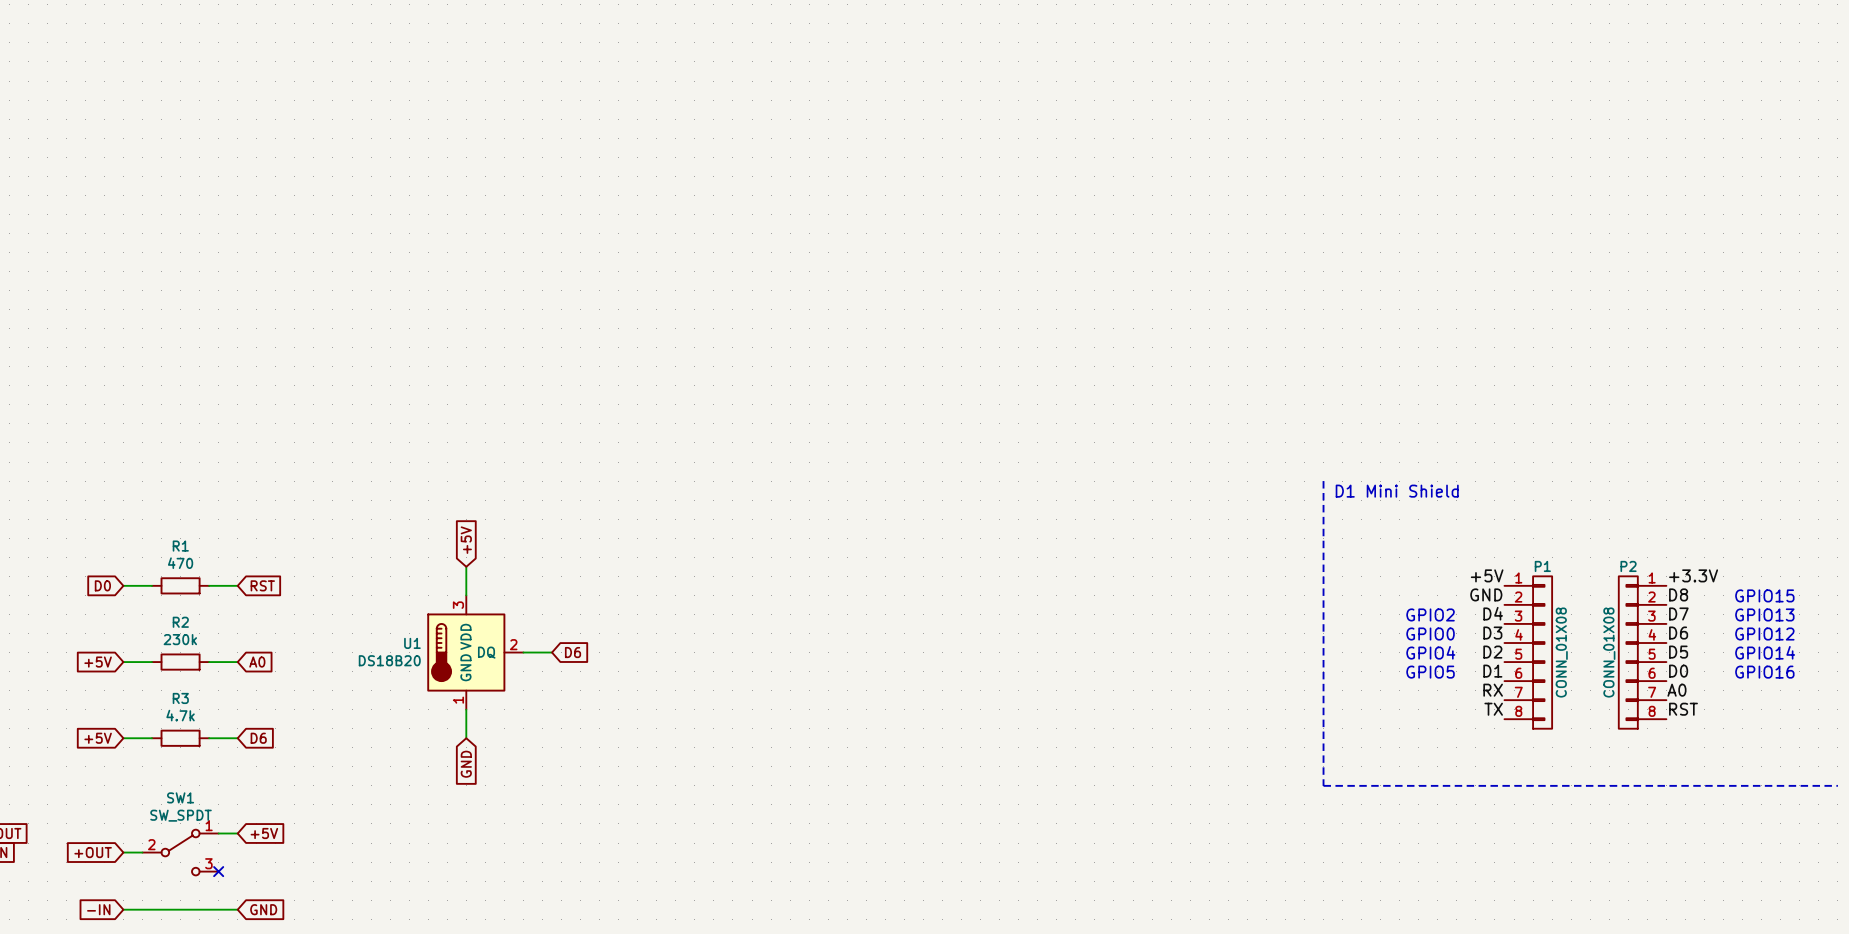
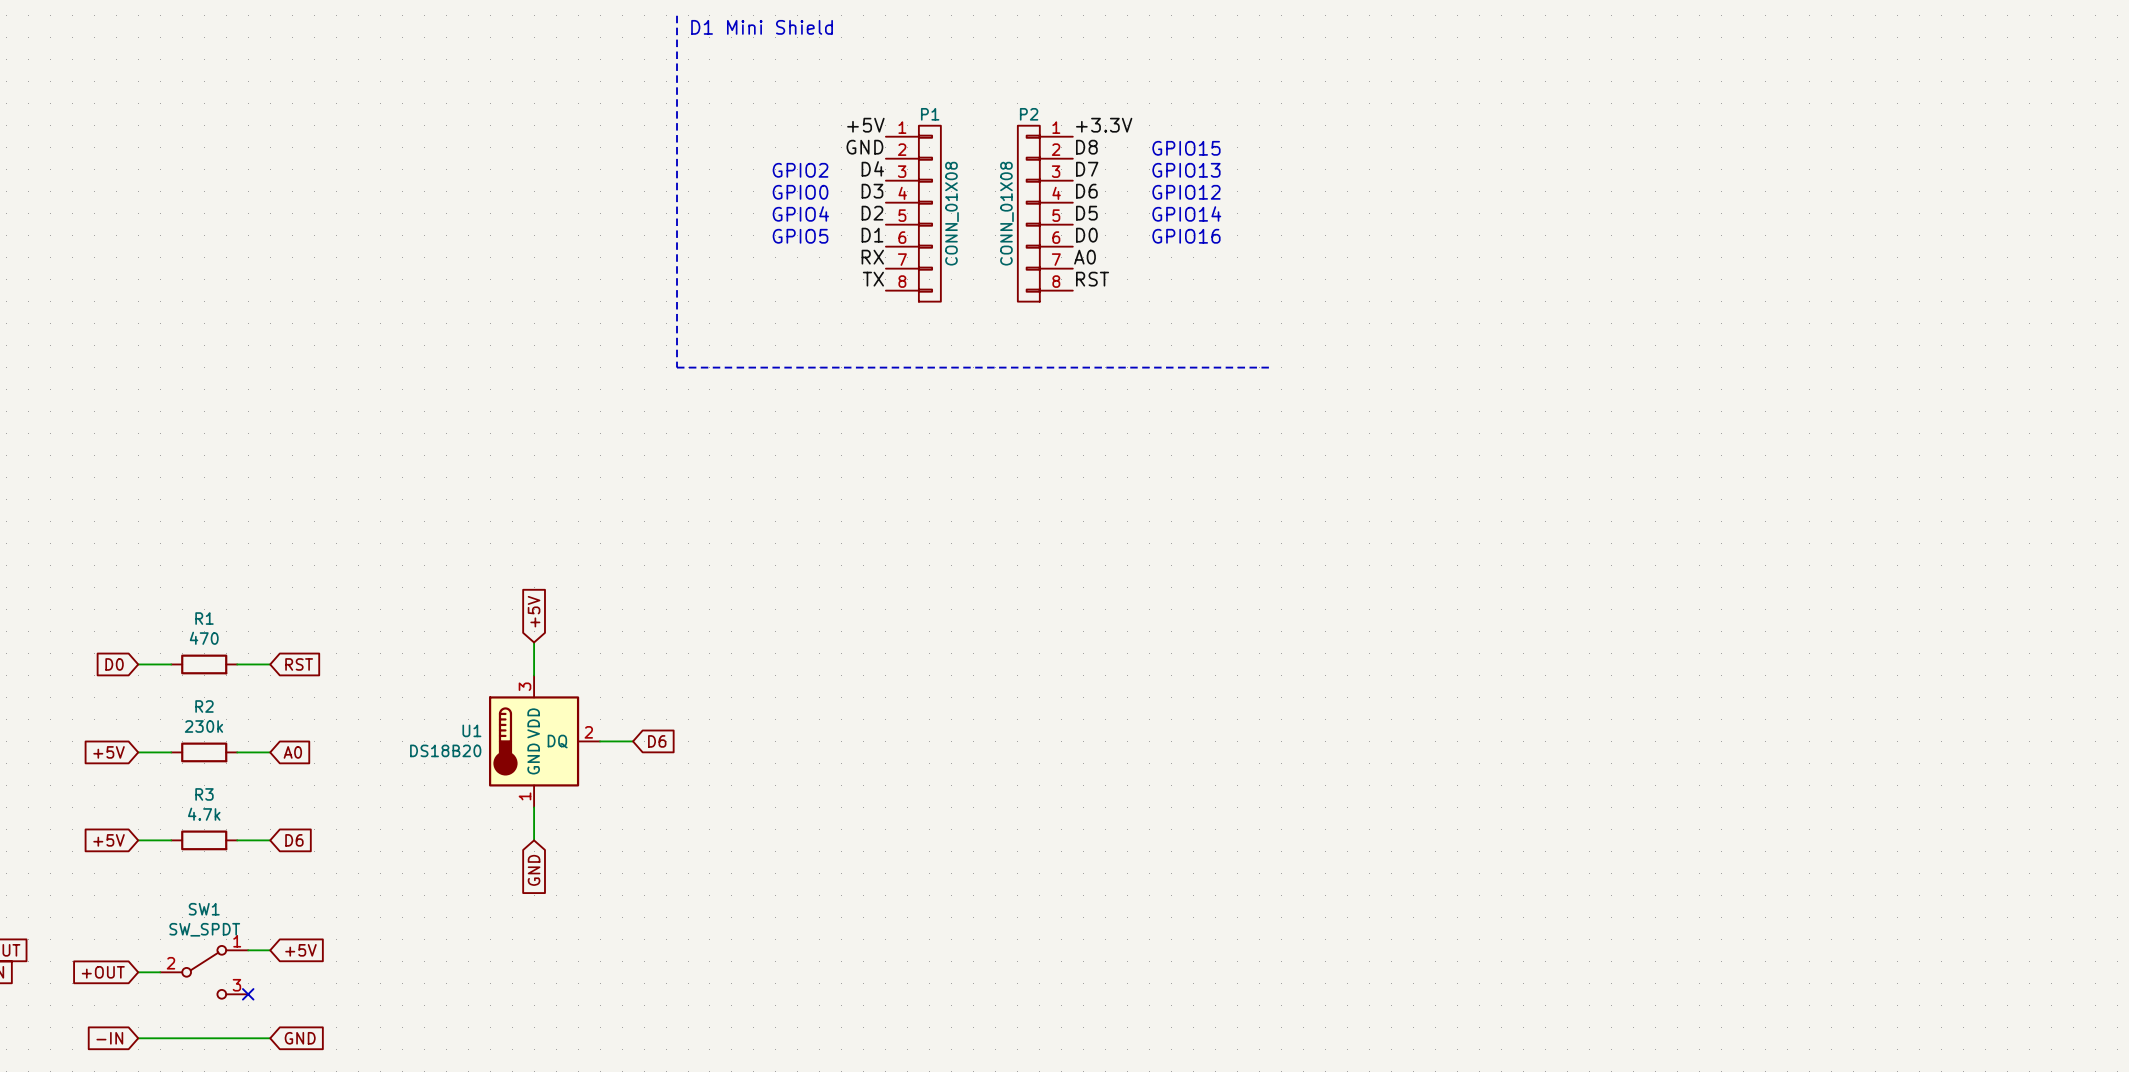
line: none -> (677, 15) (677, 367) (1270, 367)
text: none -> D1 Mini Shield (762, 27)
label: none -> +5V (865, 125)
label: none -> +3.3V (1104, 125)
label: none -> GND (864, 147)
label: none -> D8 (1086, 147)
text: none -> GPIO15 (1186, 148)
label: none -> D4 (872, 168)
label: none -> D7 (1087, 169)
text: none -> GPIO2 (800, 170)
text: none -> GPIO13 (1186, 170)
label: none -> D3 (872, 191)
label: none -> D6 (1086, 191)
text: none -> GPIO0 (800, 192)
text: none -> GPIO12 (1186, 192)
label: none -> D2 (872, 213)
label: none -> D5 (1086, 213)
text: none -> GPIO4 (800, 213)
text: none -> GPIO14 (1186, 213)
label: none -> D1 (872, 235)
label: none -> D0 (1086, 235)
text: none -> GPIO5 (800, 236)
text: none -> GPIO16 (1186, 236)
label: none -> RX (872, 257)
label: none -> A0 (1084, 257)
label: none -> TX (873, 279)
label: none -> RST (1092, 279)
line: (1323, 481) (1323, 785) (1837, 785) -> none
text: D1 Mini Shield (1397, 491) -> none
label: +5V (1487, 575) -> none
label: +3.3V (1693, 575) -> none
label: GND (1486, 594) -> none
label: D8 (1678, 594) -> none
text: GPIO15 (1764, 595) -> none
label: D4 (1493, 613) -> none
label: D7 (1678, 613) -> none
text: GPIO2 (1430, 614) -> none
text: GPIO13 (1764, 614) -> none
label: D3 (1492, 633) -> none
label: D6 (1678, 633) -> none
text: GPIO0 (1430, 634) -> none
text: GPIO12 (1764, 634) -> none
text: GPIO4 (1430, 652) -> none
label: D2 (1492, 652) -> none
P1 position: (1528, 652) -> (913, 213)
P2 position: (1642, 652) -> (1045, 213)
label: D5 (1678, 652) -> none
text: GPIO14 (1765, 652) -> none
label: D1 (1492, 671) -> none
label: D0 (1678, 671) -> none
text: GPIO5 (1430, 672) -> none
text: GPIO16 (1764, 672) -> none
label: RX (1493, 690) -> none
label: A0 (1676, 690) -> none
label: TX (1493, 709) -> none
label: RST (1683, 709) -> none

